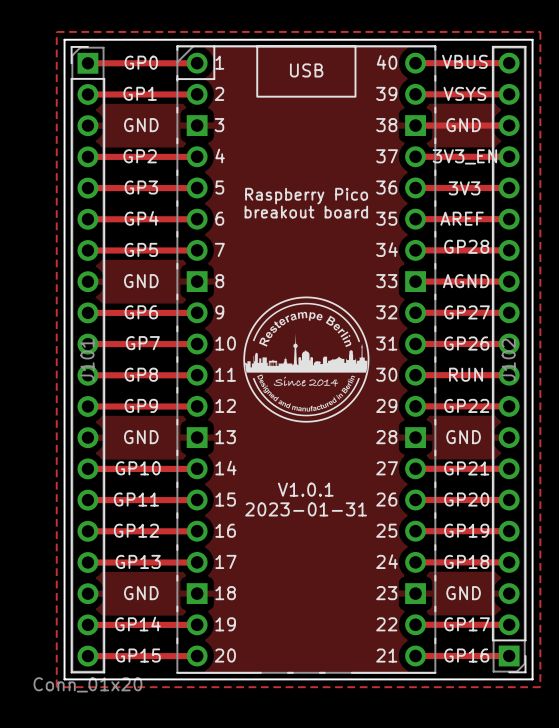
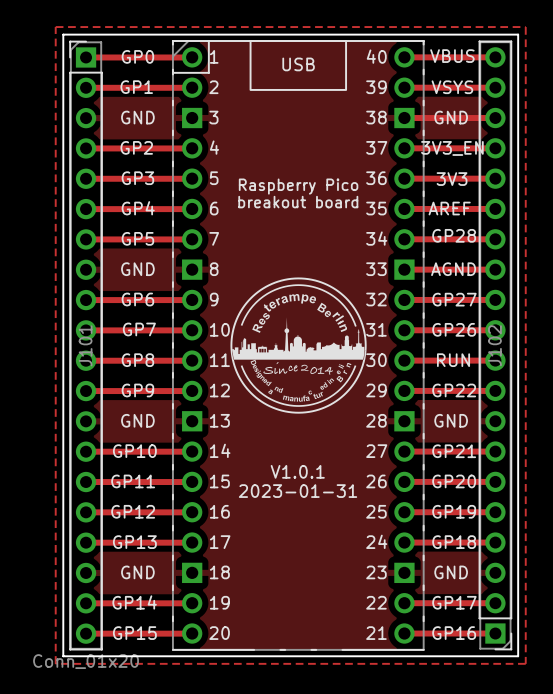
drawing shape: [243, 296, 370, 423] -> [230, 277, 367, 414]
drawing: none -> [240, 284, 357, 333]
drawing: [252, 302, 361, 348] -> none
drawing: [252, 375, 360, 417] -> none
drawing: none -> [240, 363, 357, 407]

